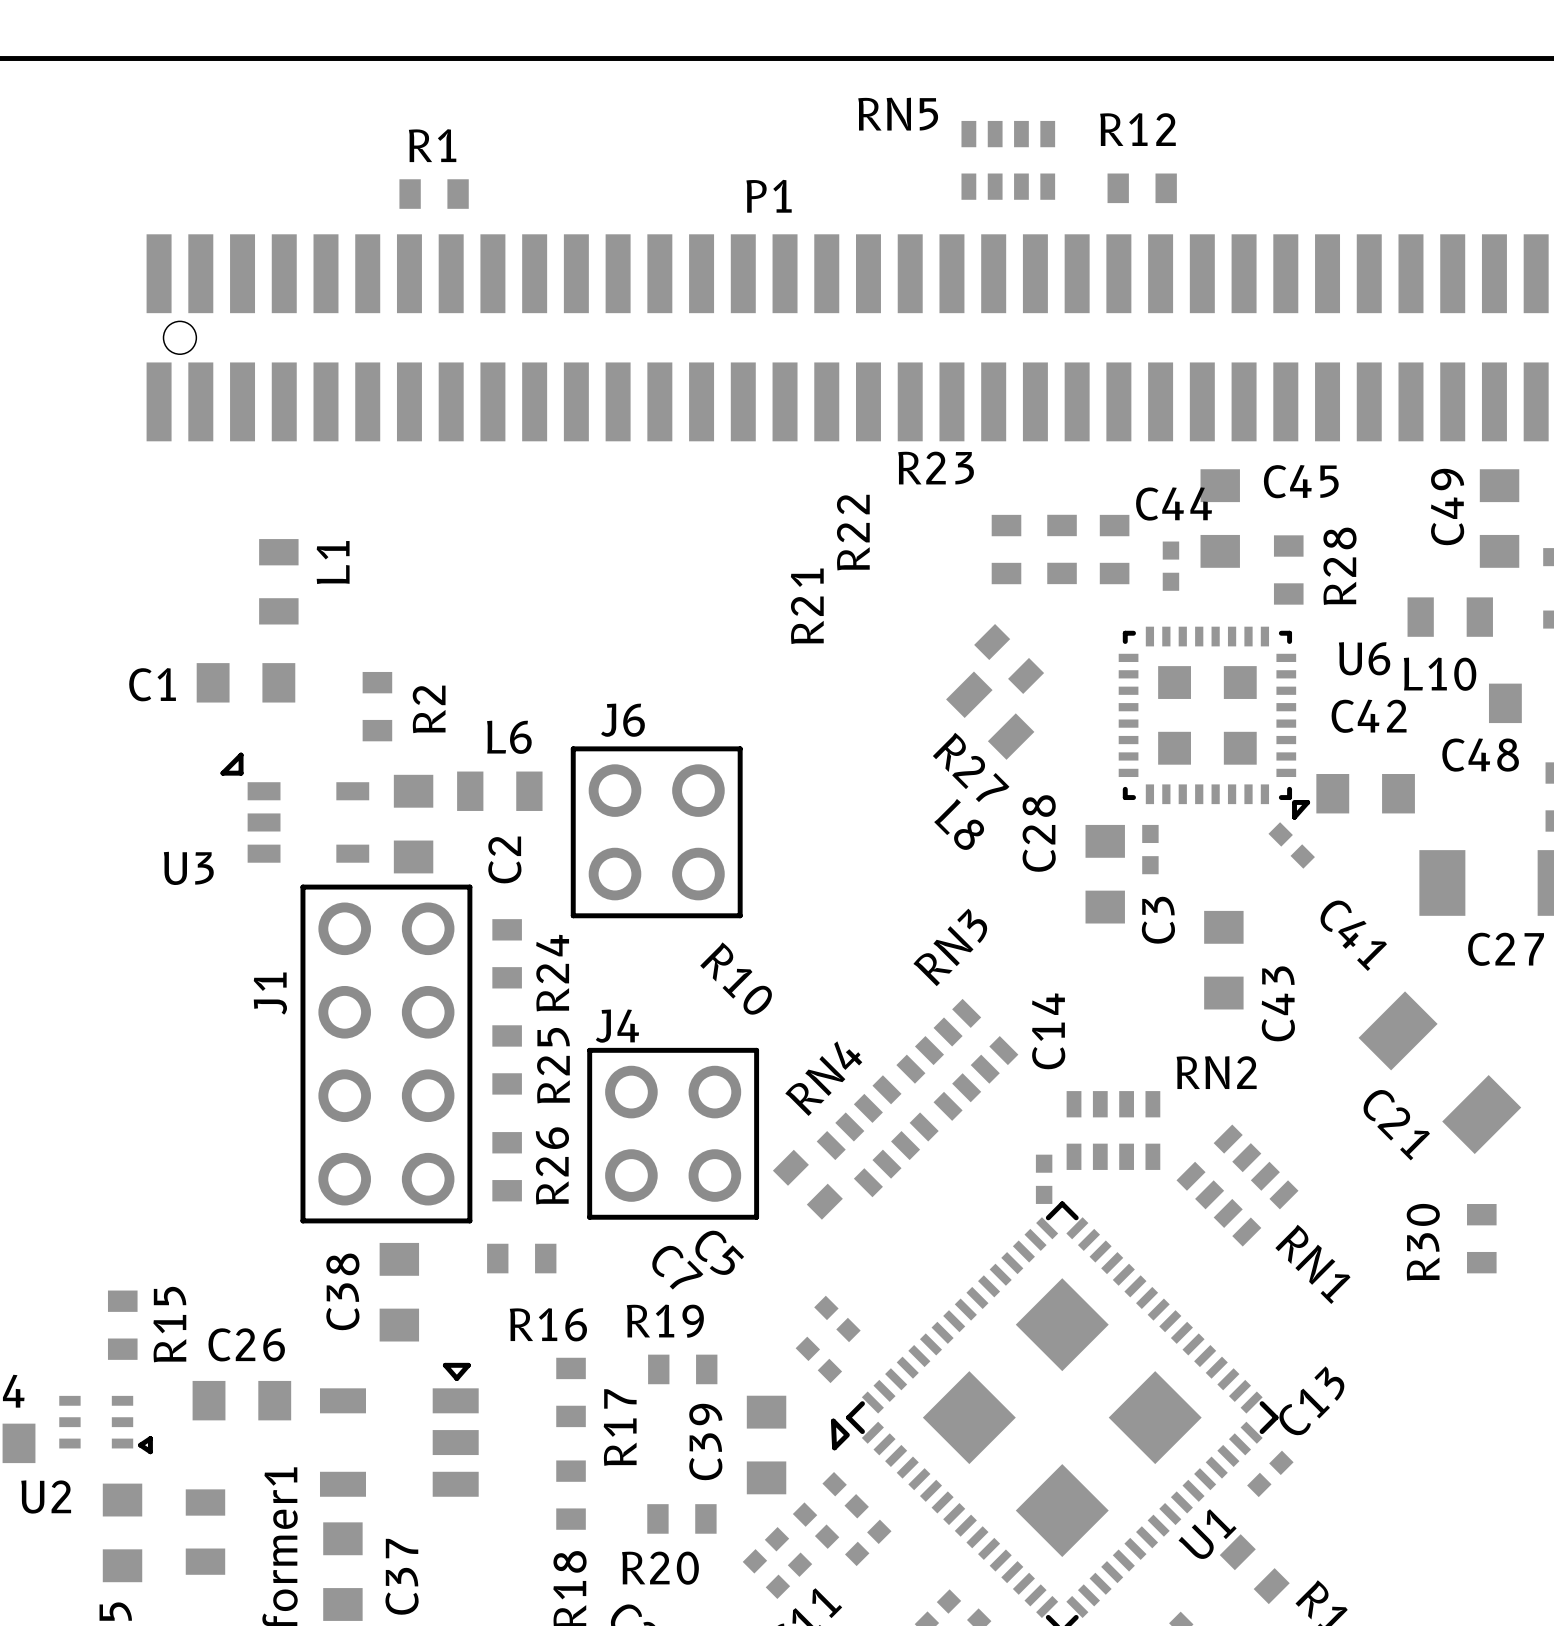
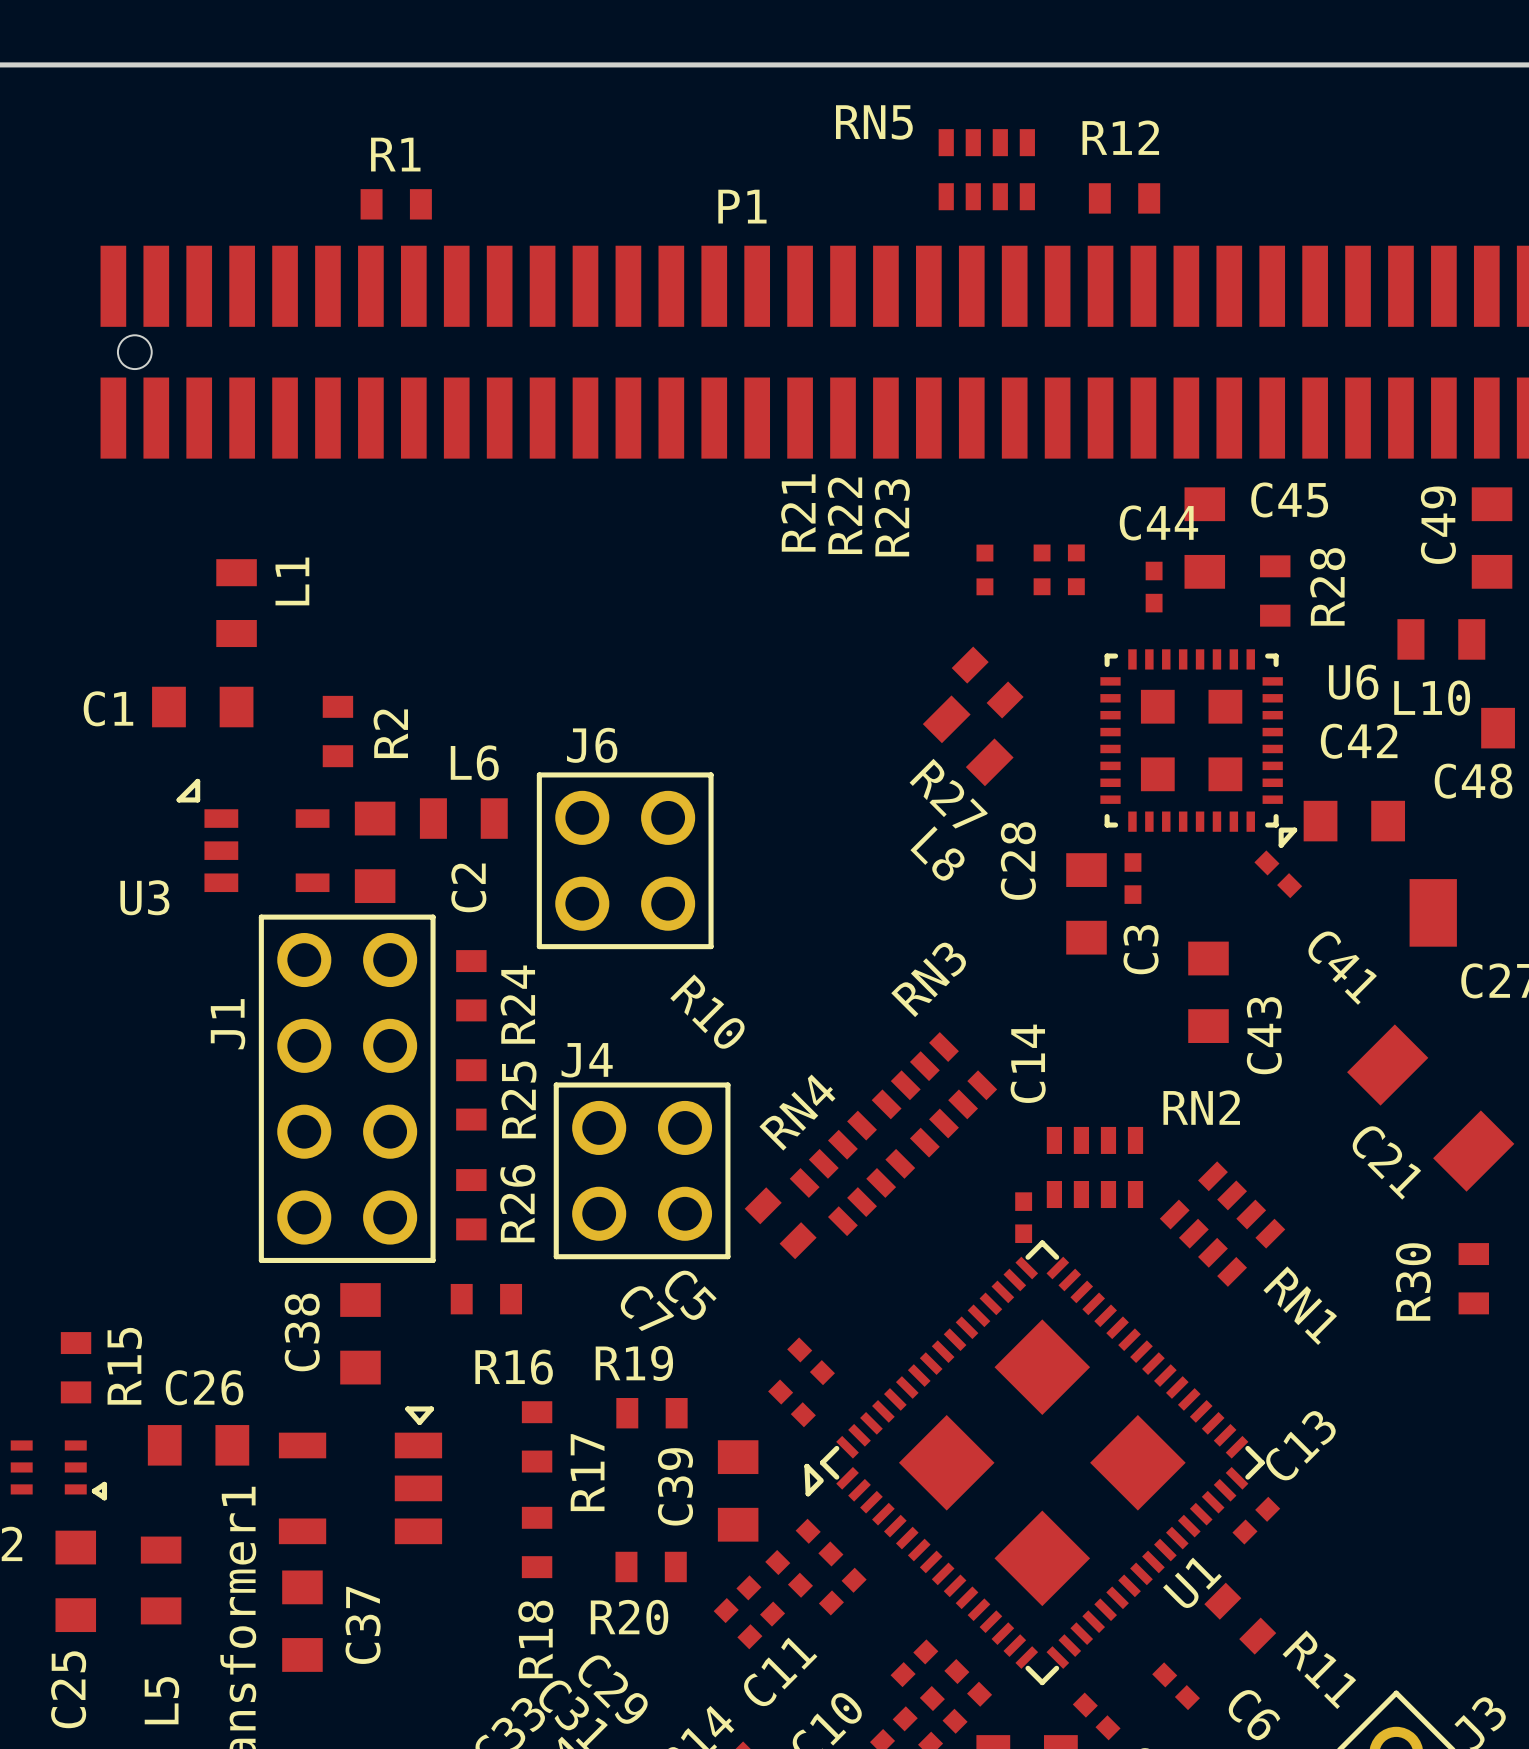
R23 name rotation: 0° (936, 468) -> 90° counterclockwise (892, 517)
R21 footprint: [991, 514, 1022, 585] -> [976, 544, 994, 596]
R22 footprint: [1047, 514, 1077, 585] -> [1033, 544, 1051, 596]
R23 footprint: [1099, 514, 1130, 585] -> [1067, 544, 1085, 596]
R22 name position: R22 (853, 532) -> R22 (844, 515)
R21 name position: R21 (807, 606) -> R21 (798, 512)

